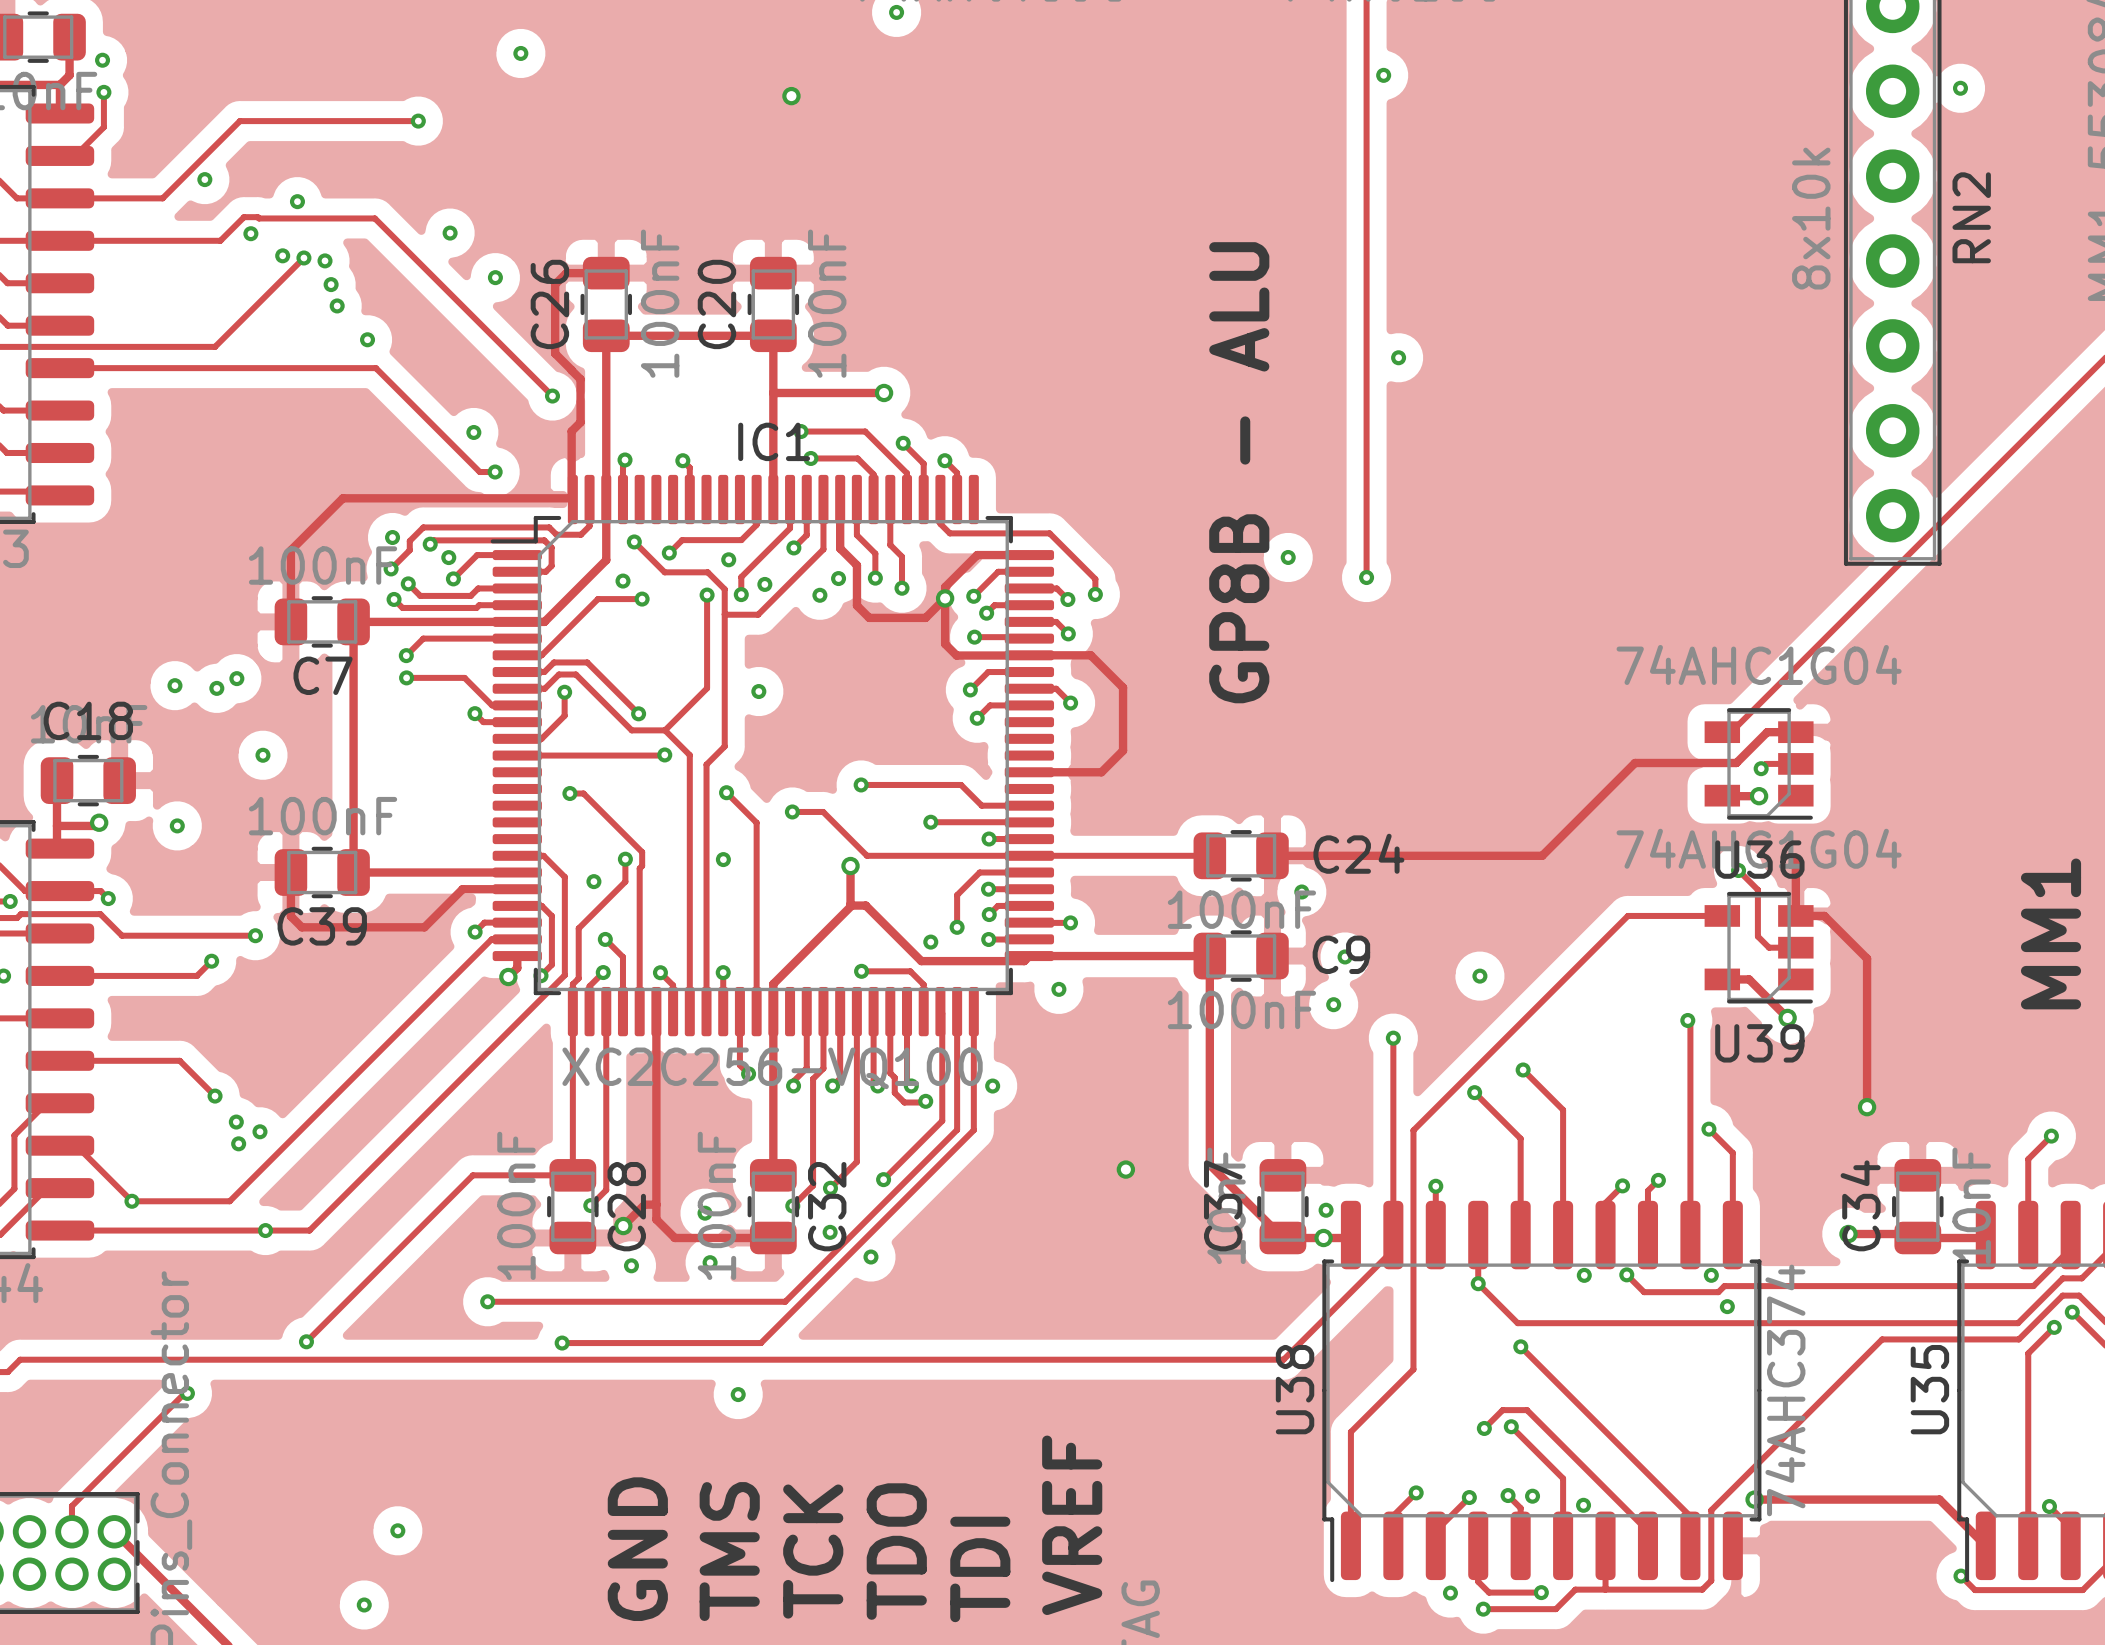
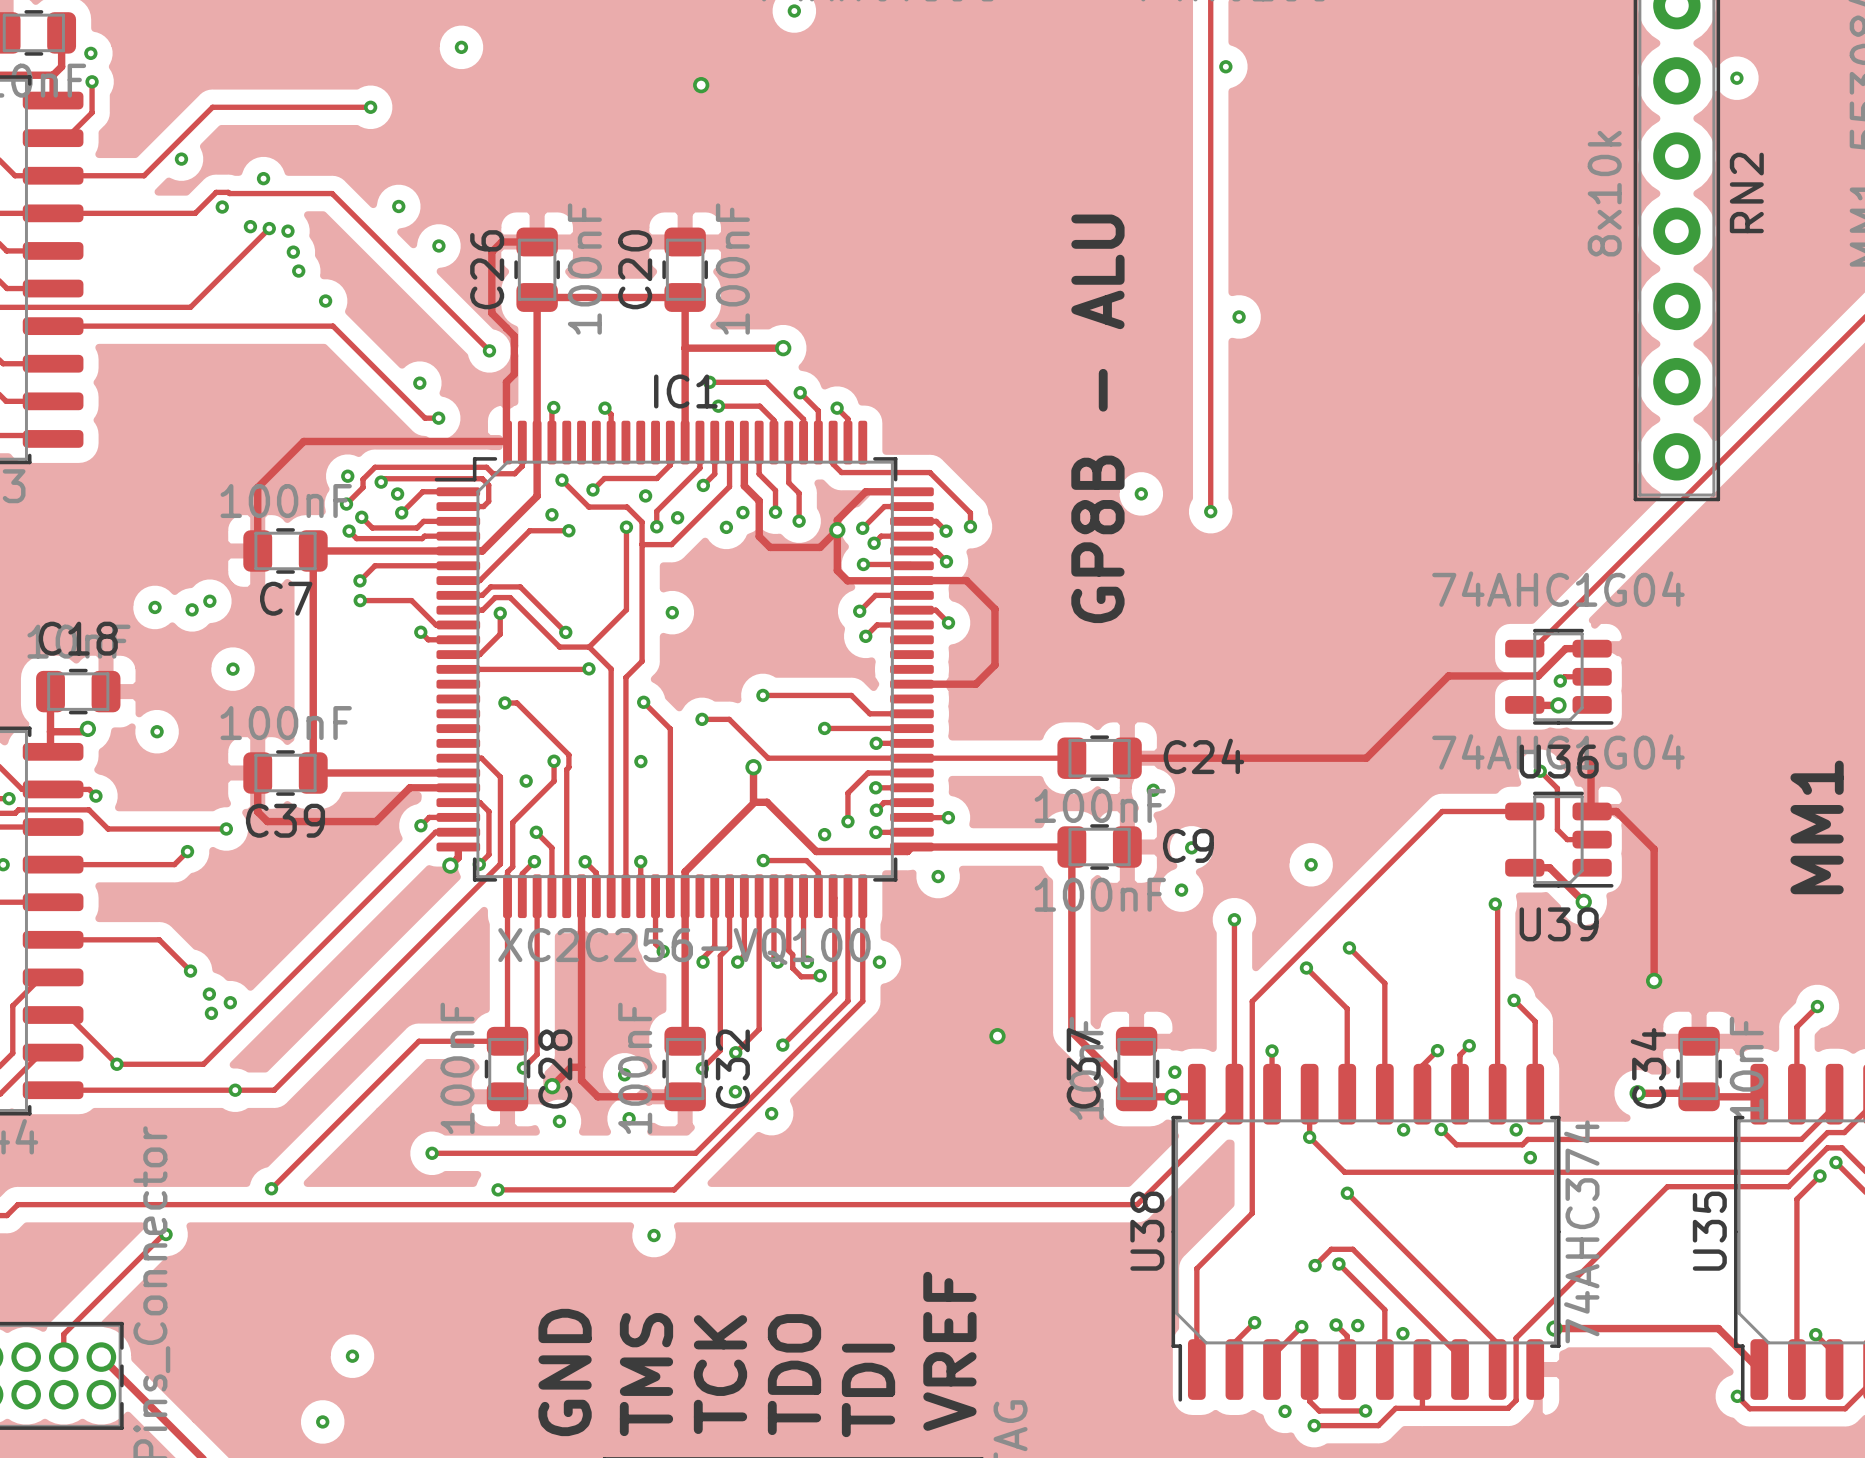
U36 footprint: [1704, 708, 1814, 820] -> [1505, 628, 1614, 725]
U39 footprint: [1704, 891, 1814, 1004] -> [1505, 791, 1614, 888]

